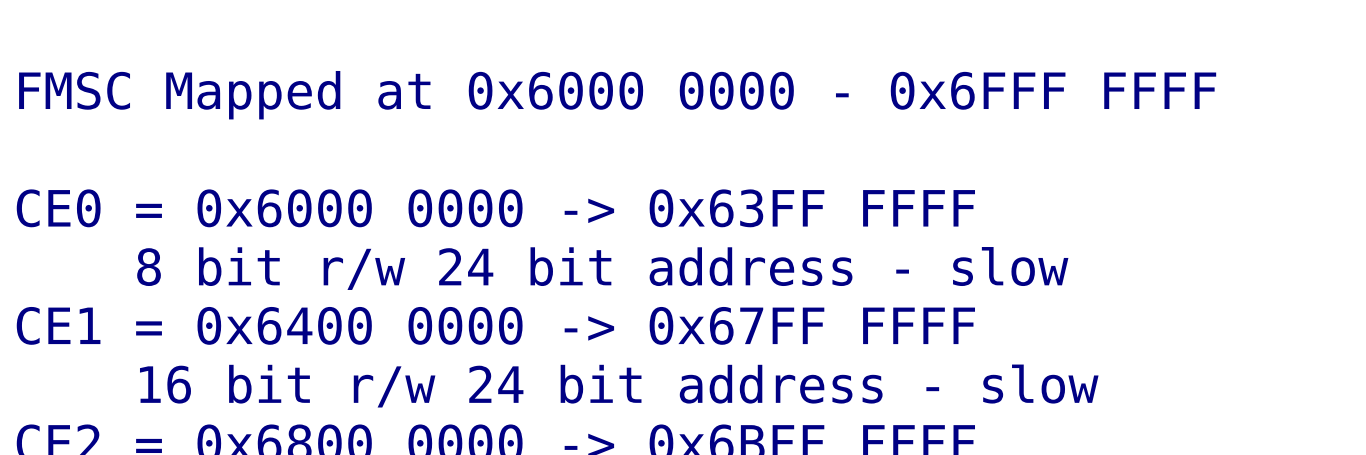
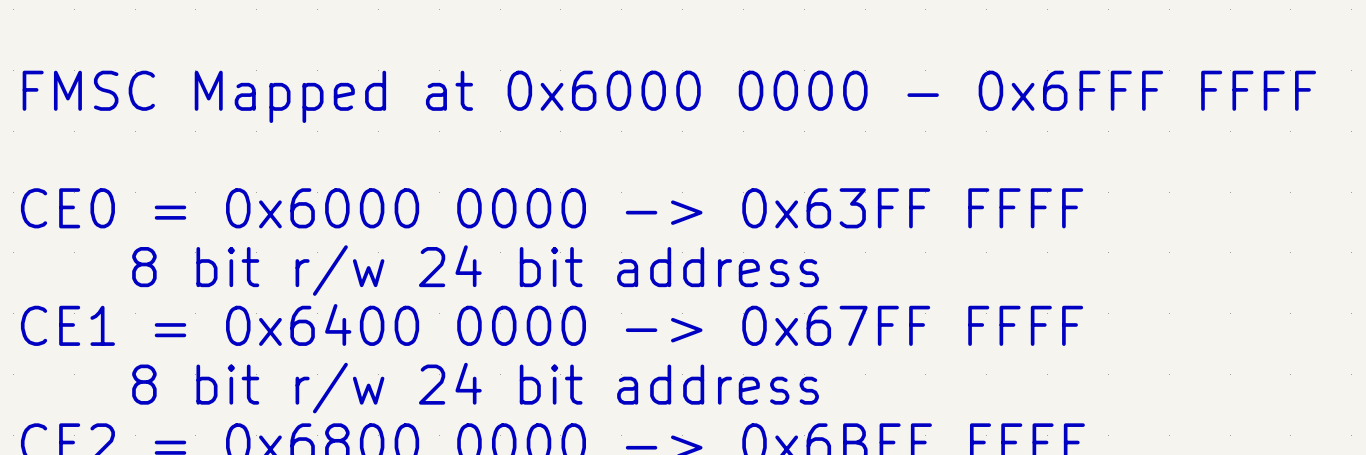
text: 8 bit r/w 24 bit address - slow (602, 268) -> 8 bit r/w 24 bit address (475, 270)
text: 16 bit r/w 24 bit address - slow (619, 386) -> 8 bit r/w 24 bit address (475, 388)

